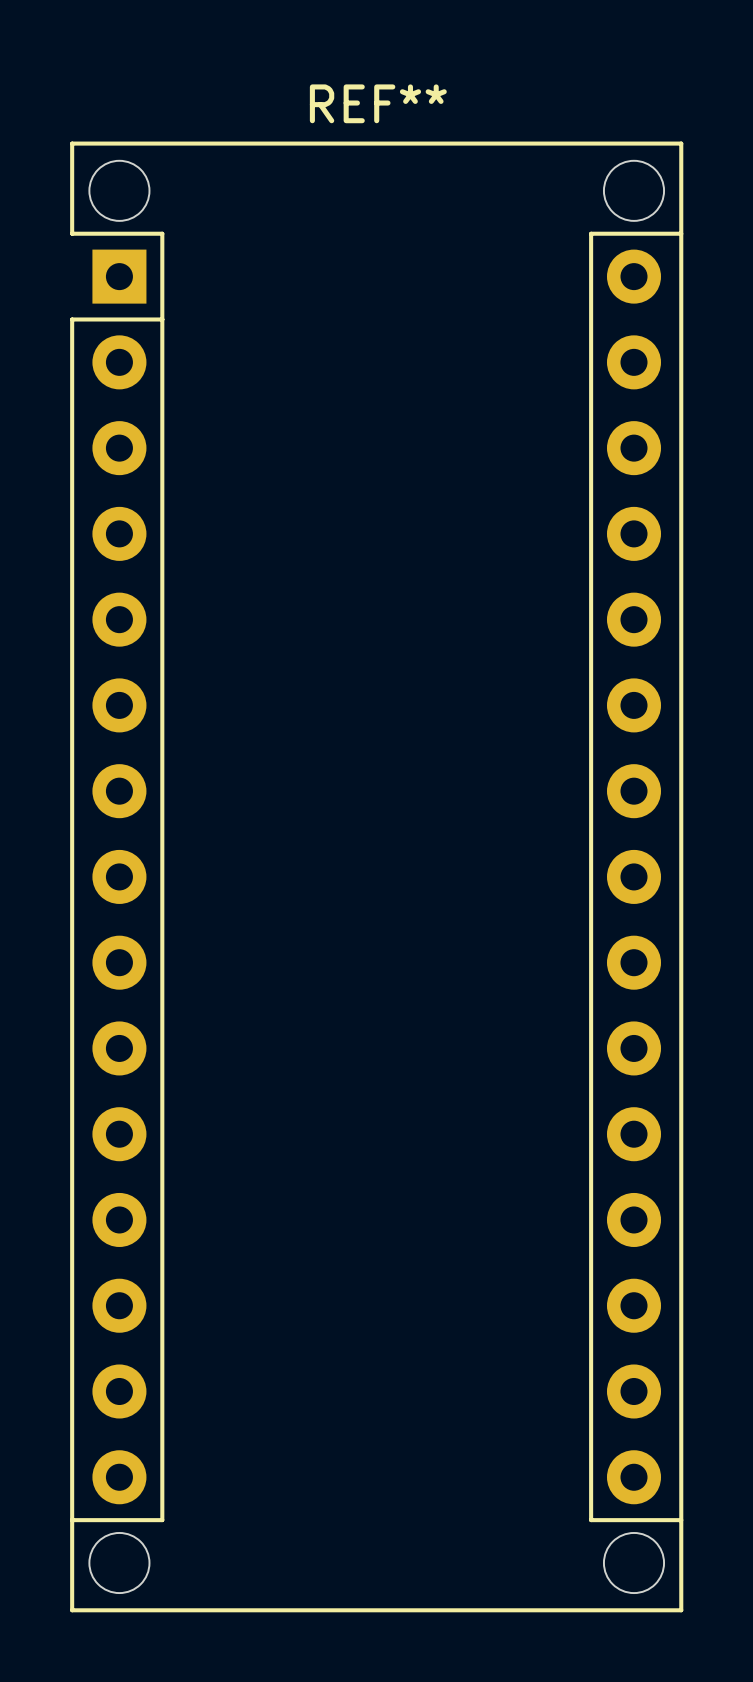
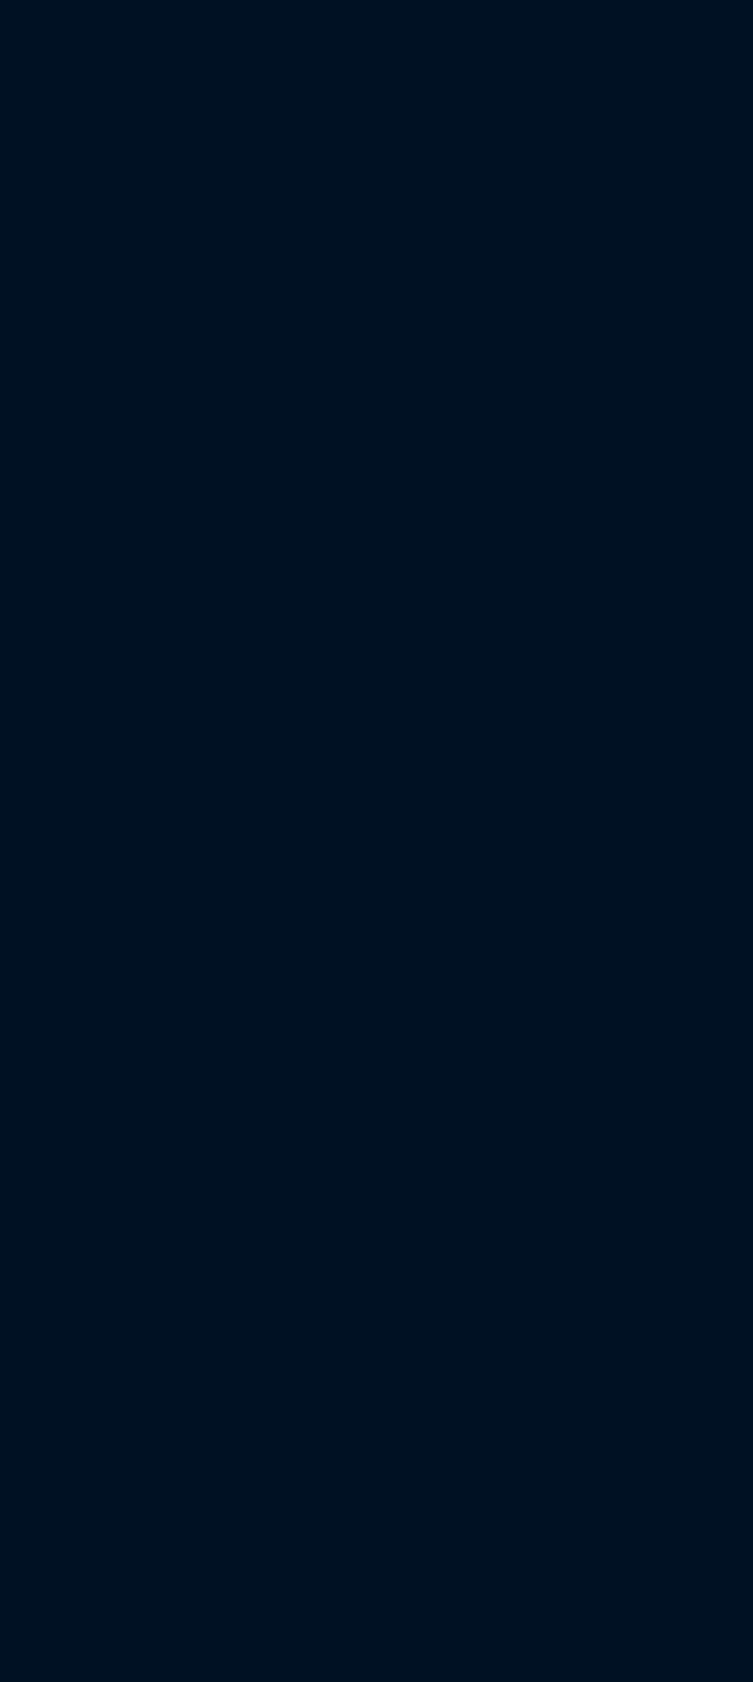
REF**: (376, 876) -> none

